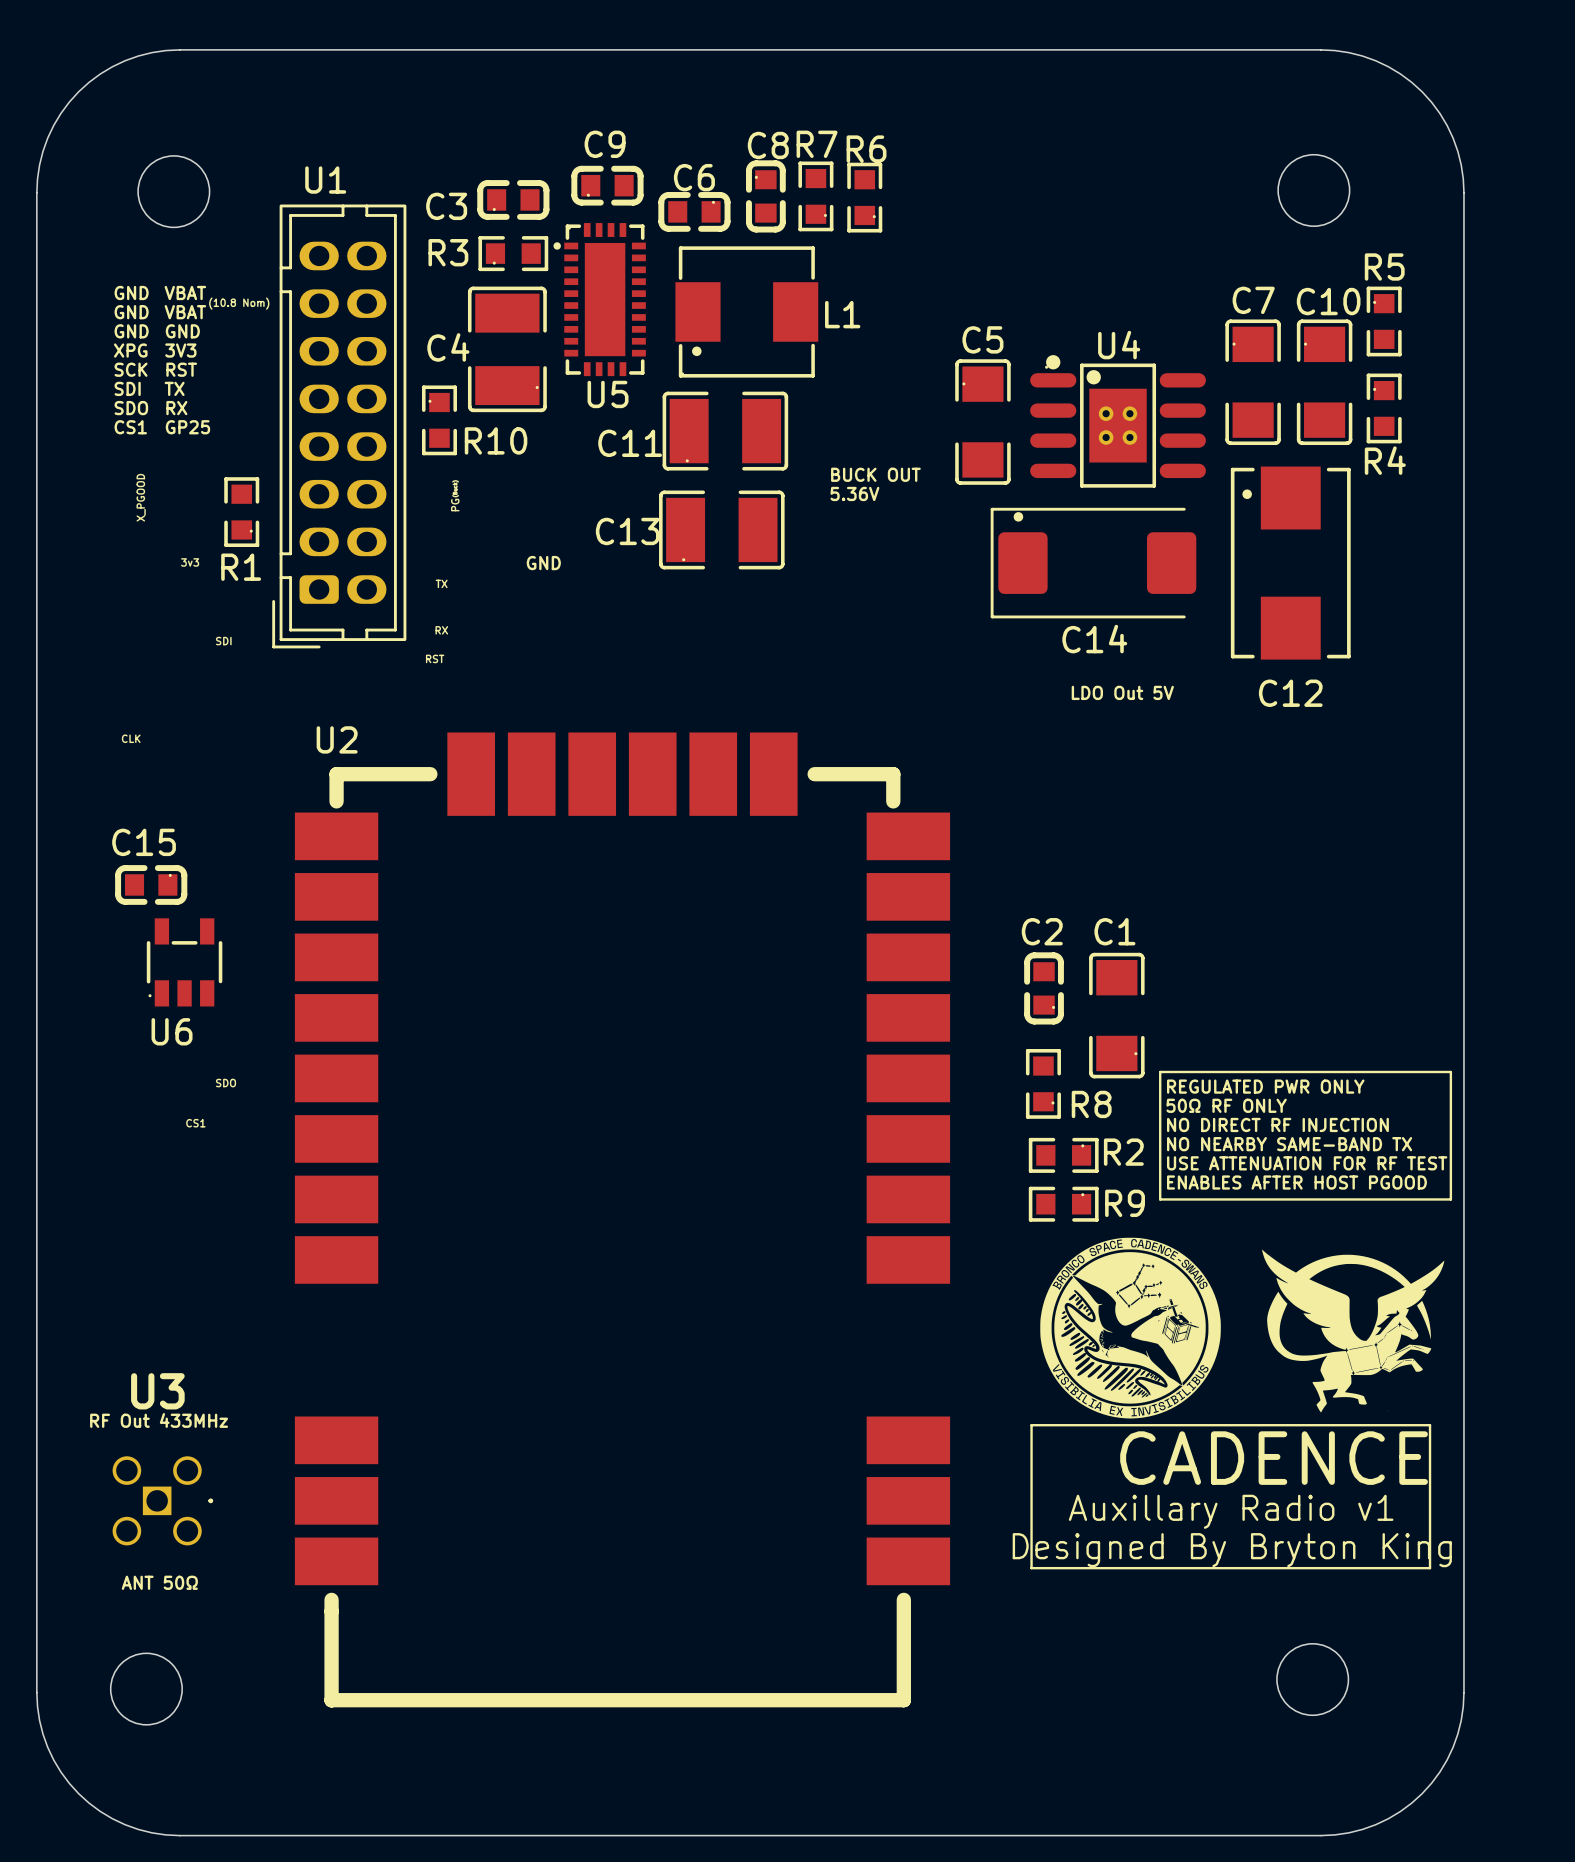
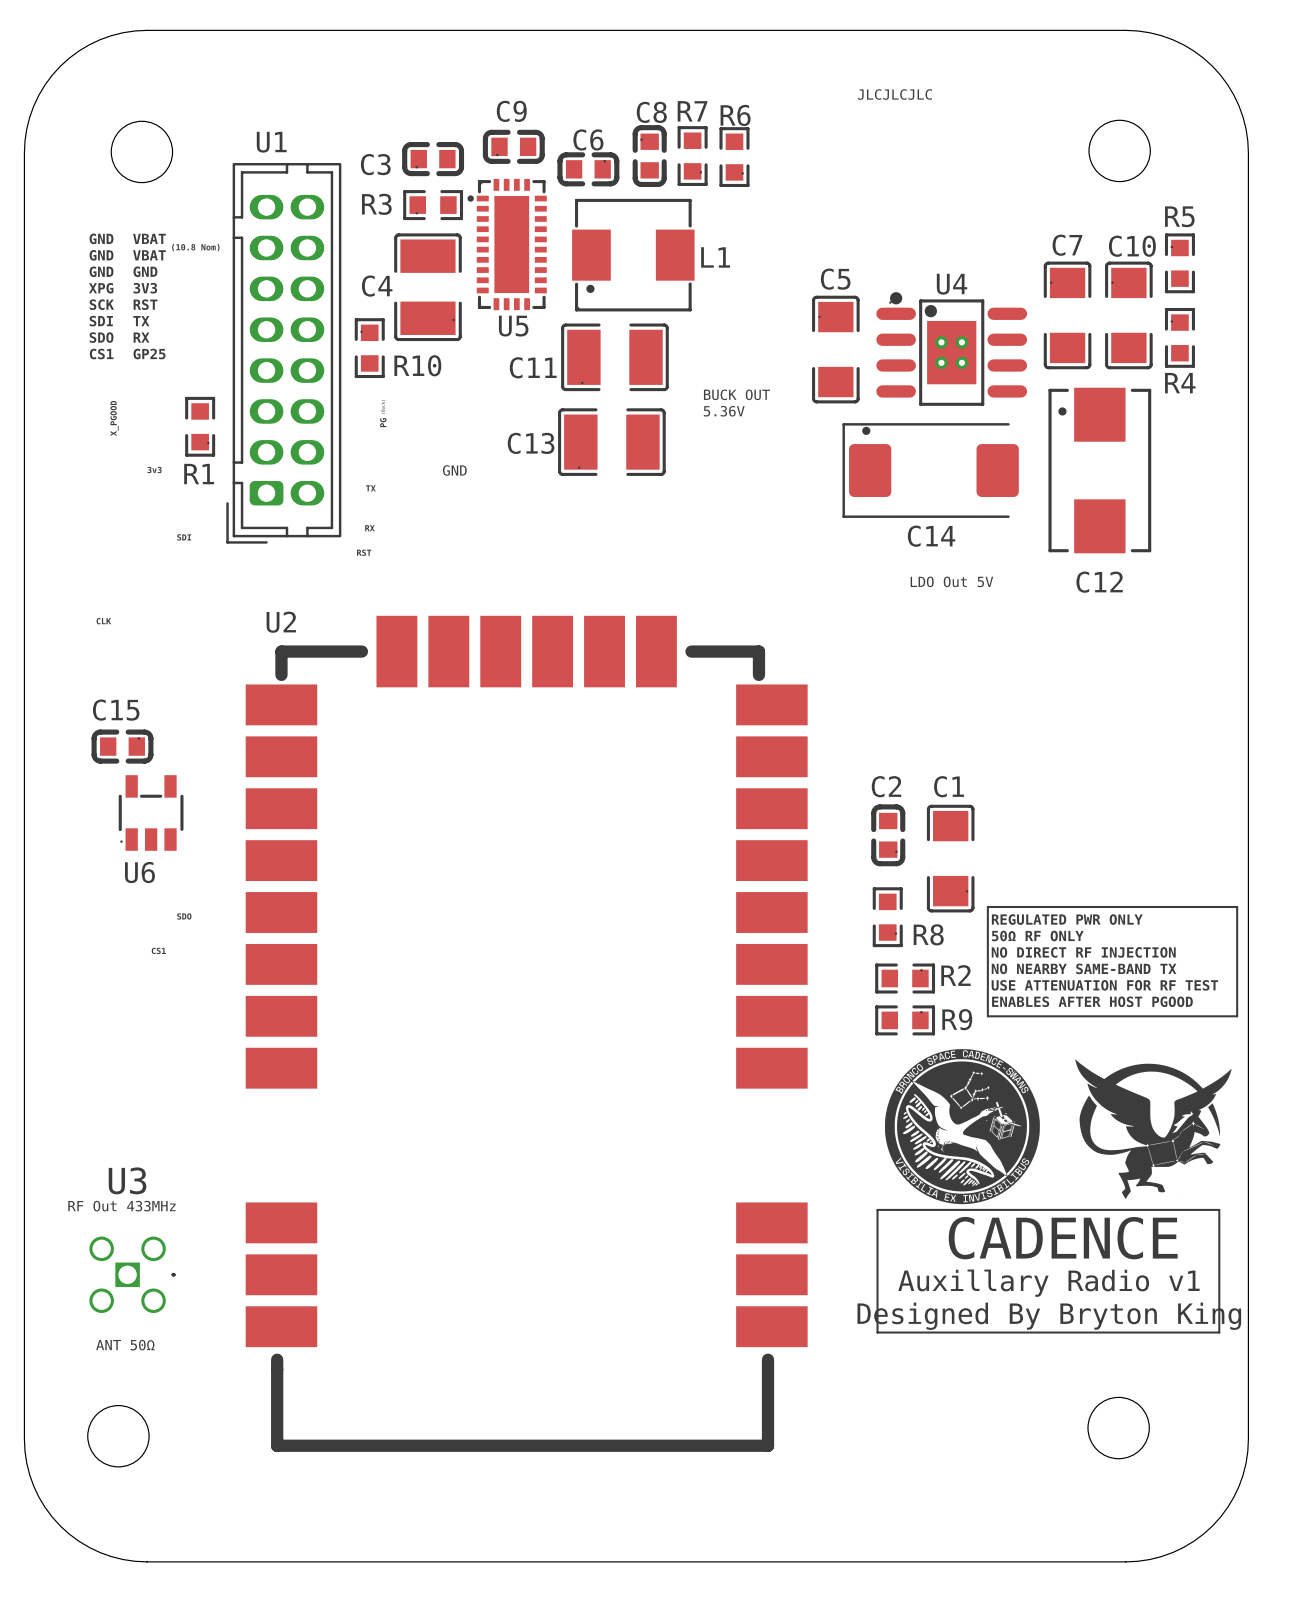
text: none -> JLCJLCJLC (894, 94)

